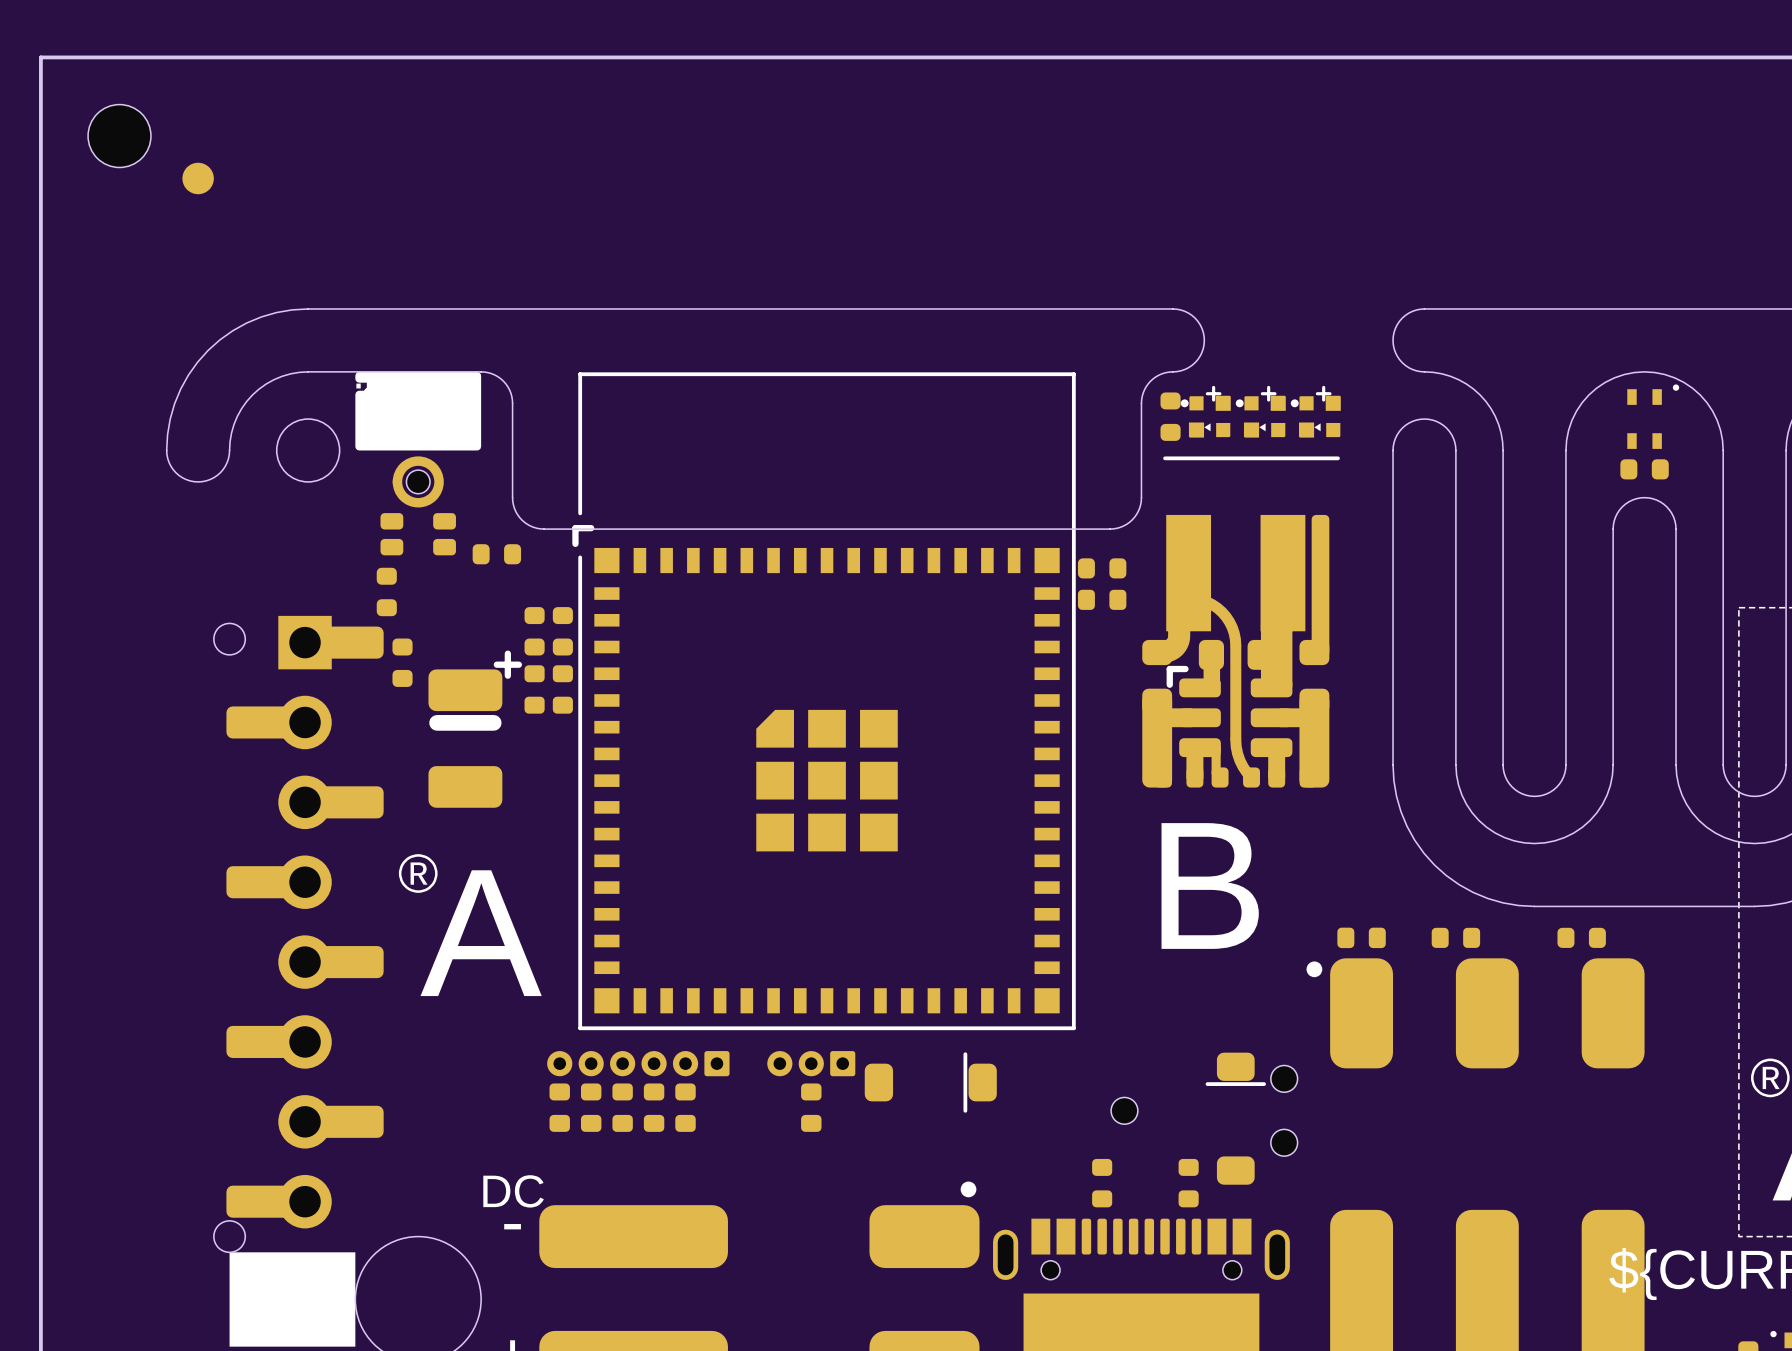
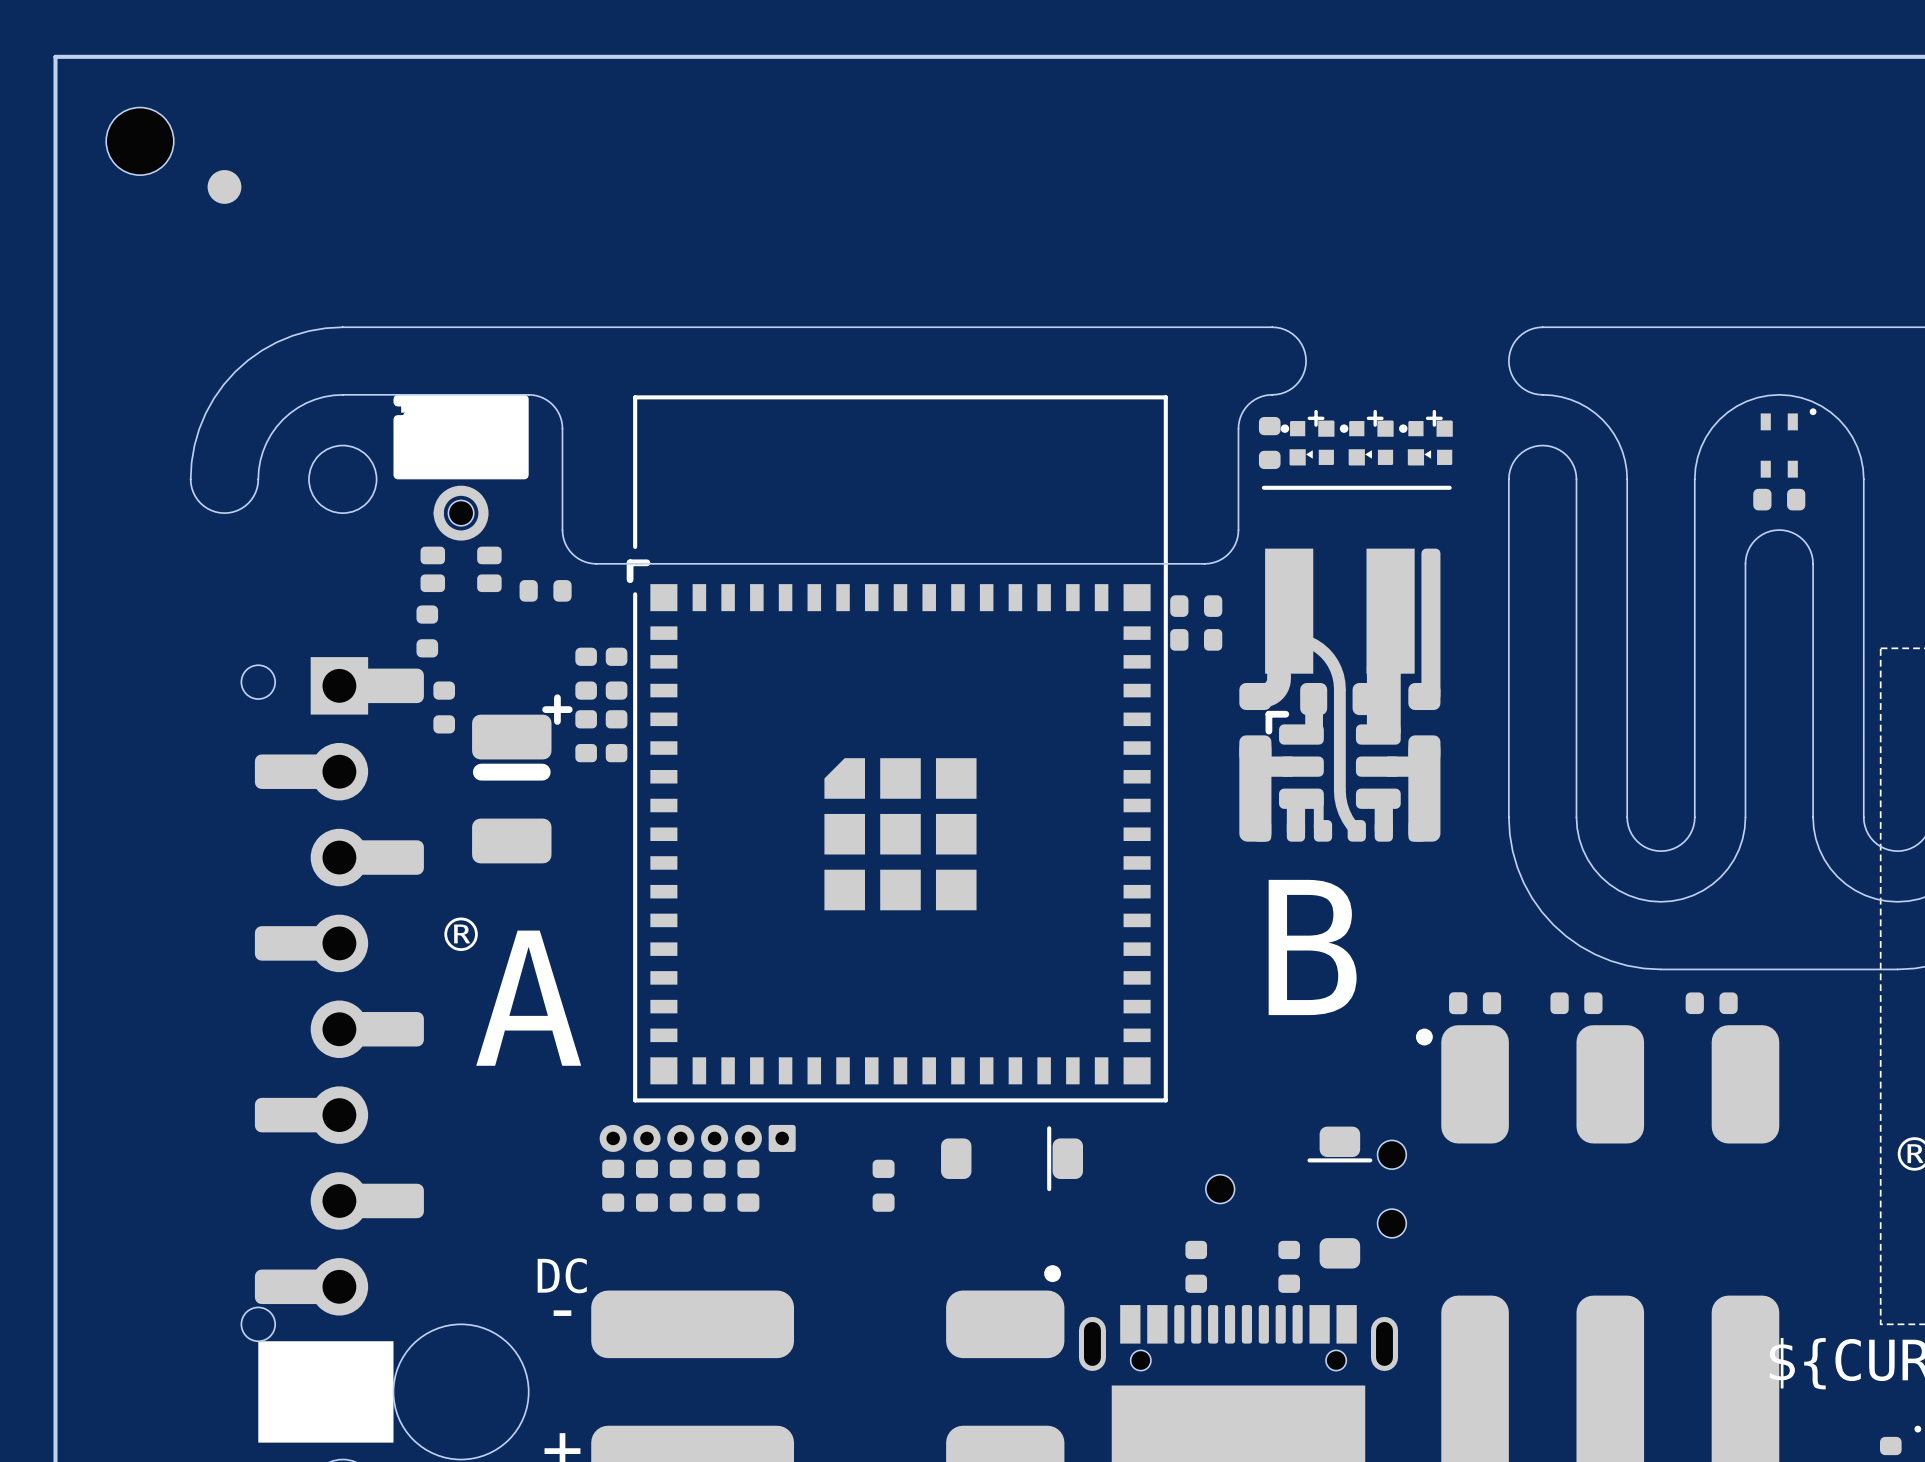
part: (779, 1063) -> none
part: (811, 1063) -> none
part: (842, 1063) -> none

